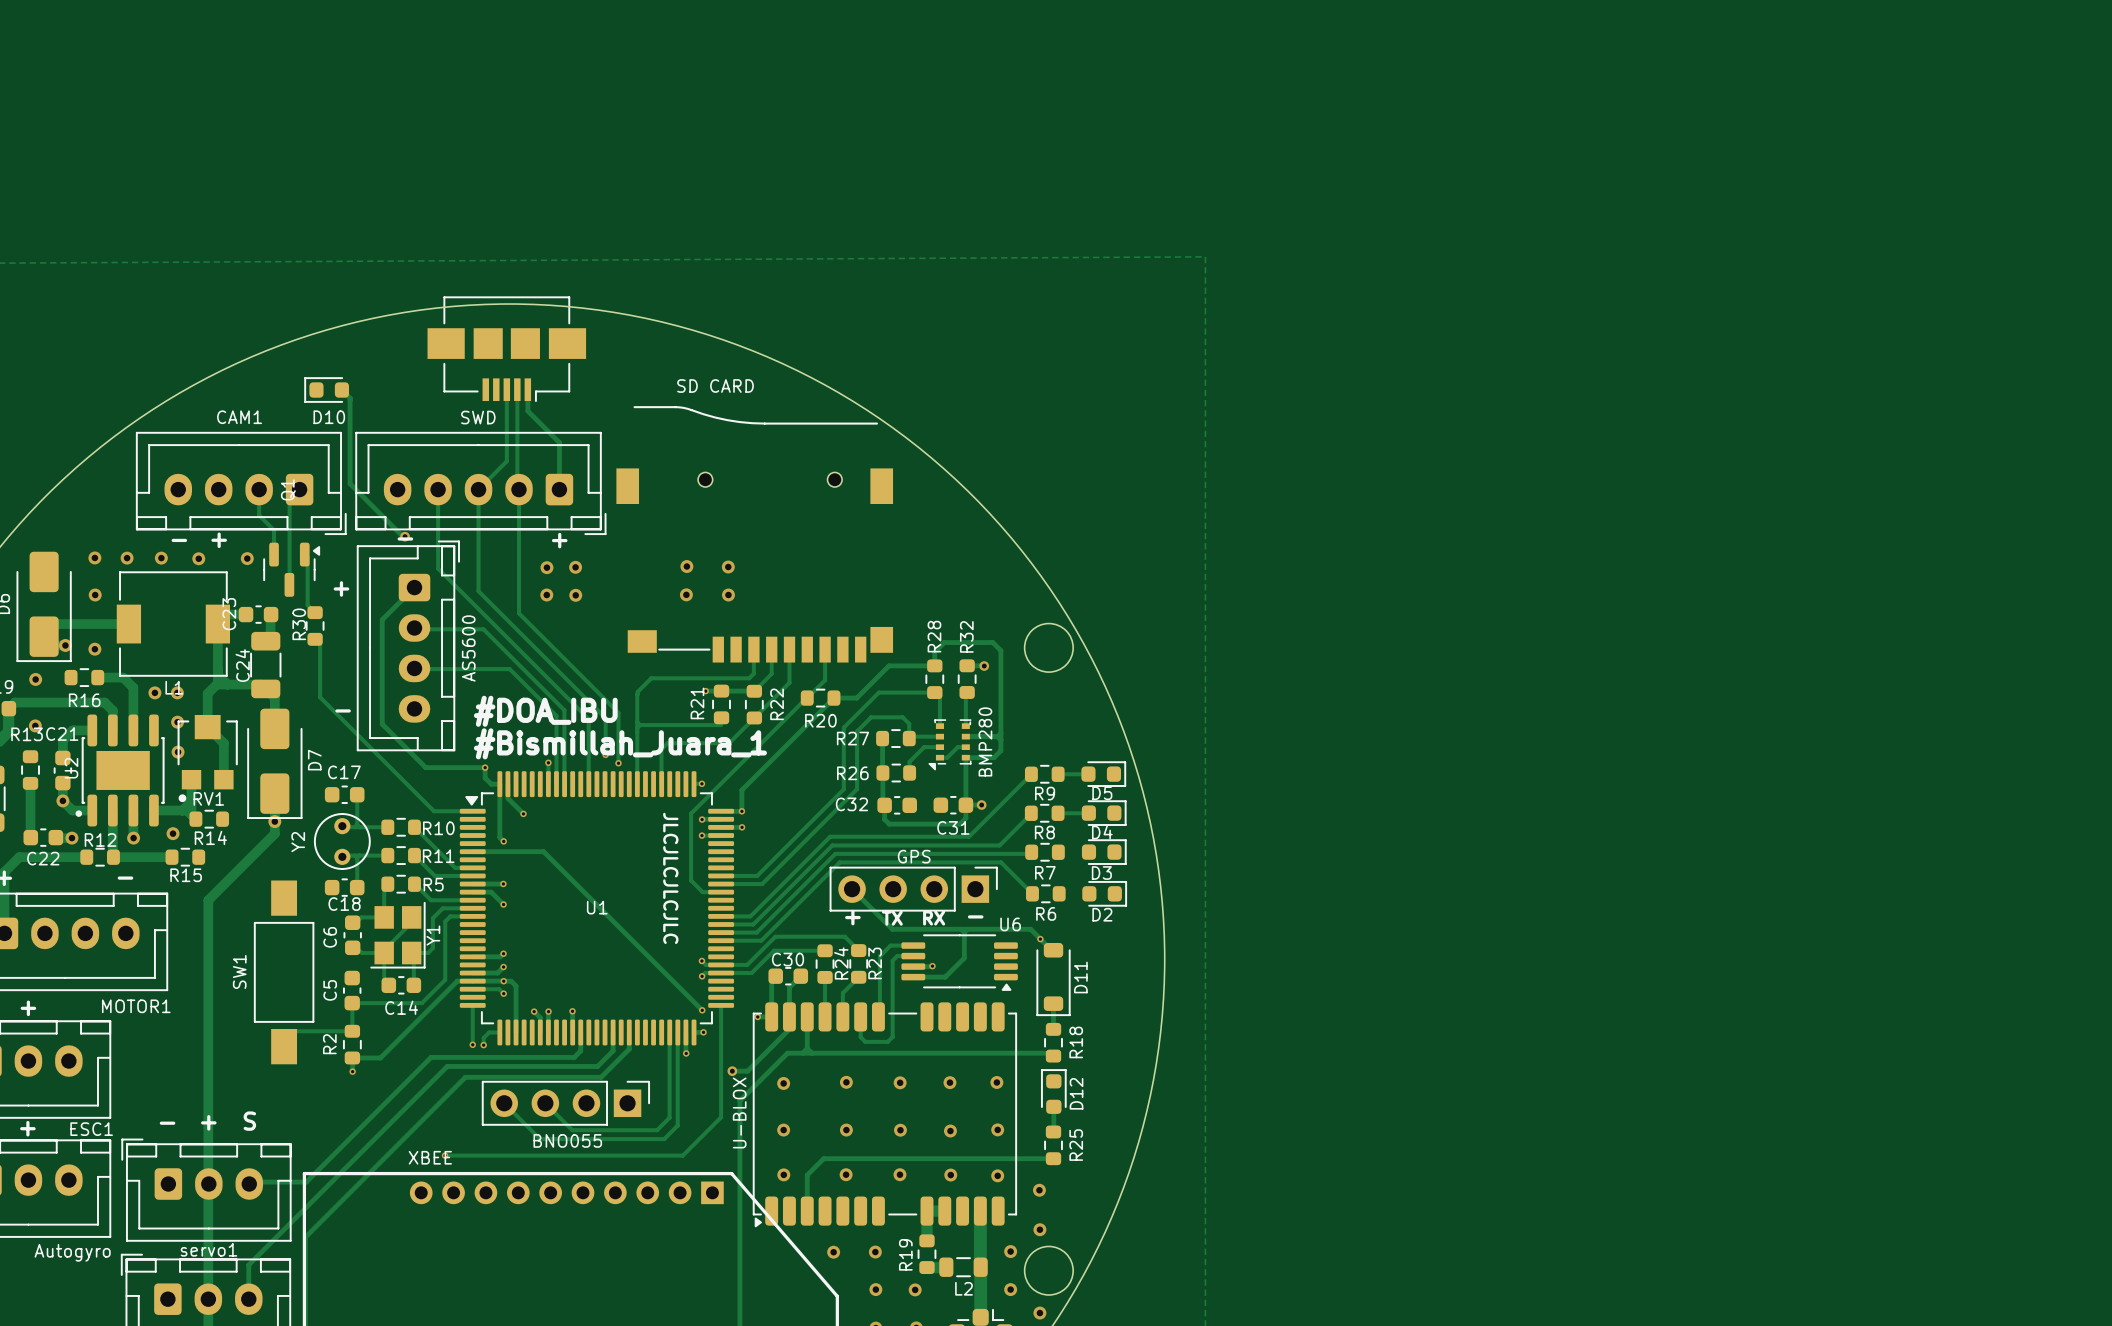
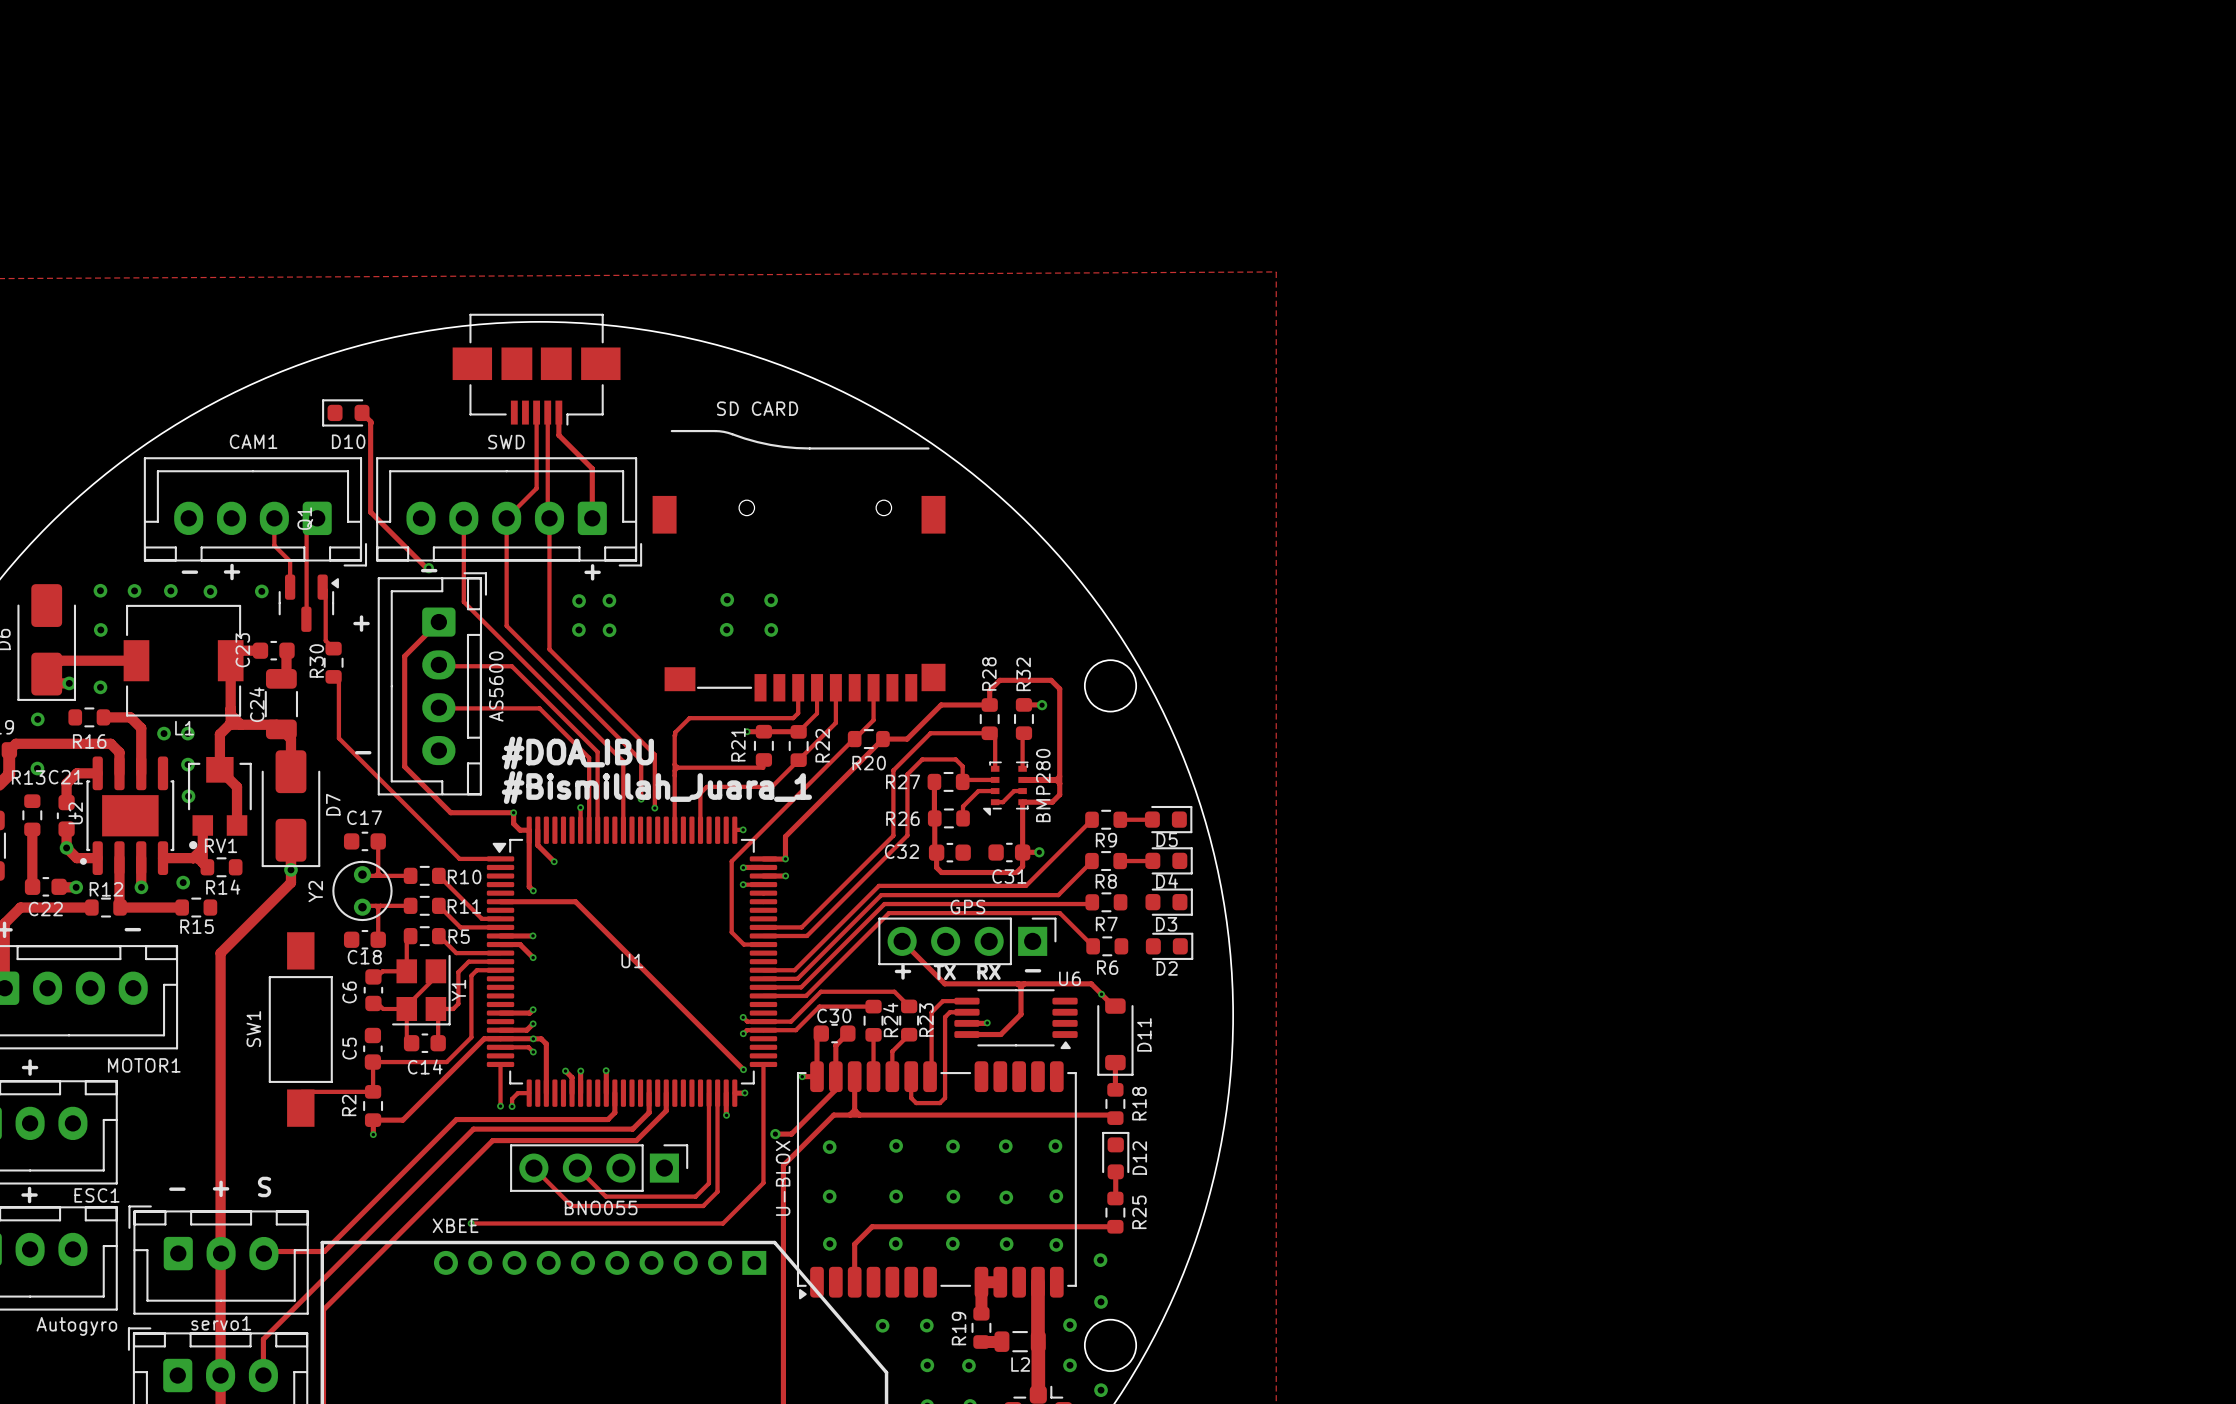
text: JLCJLCJLCJLC (670, 878) -> none

